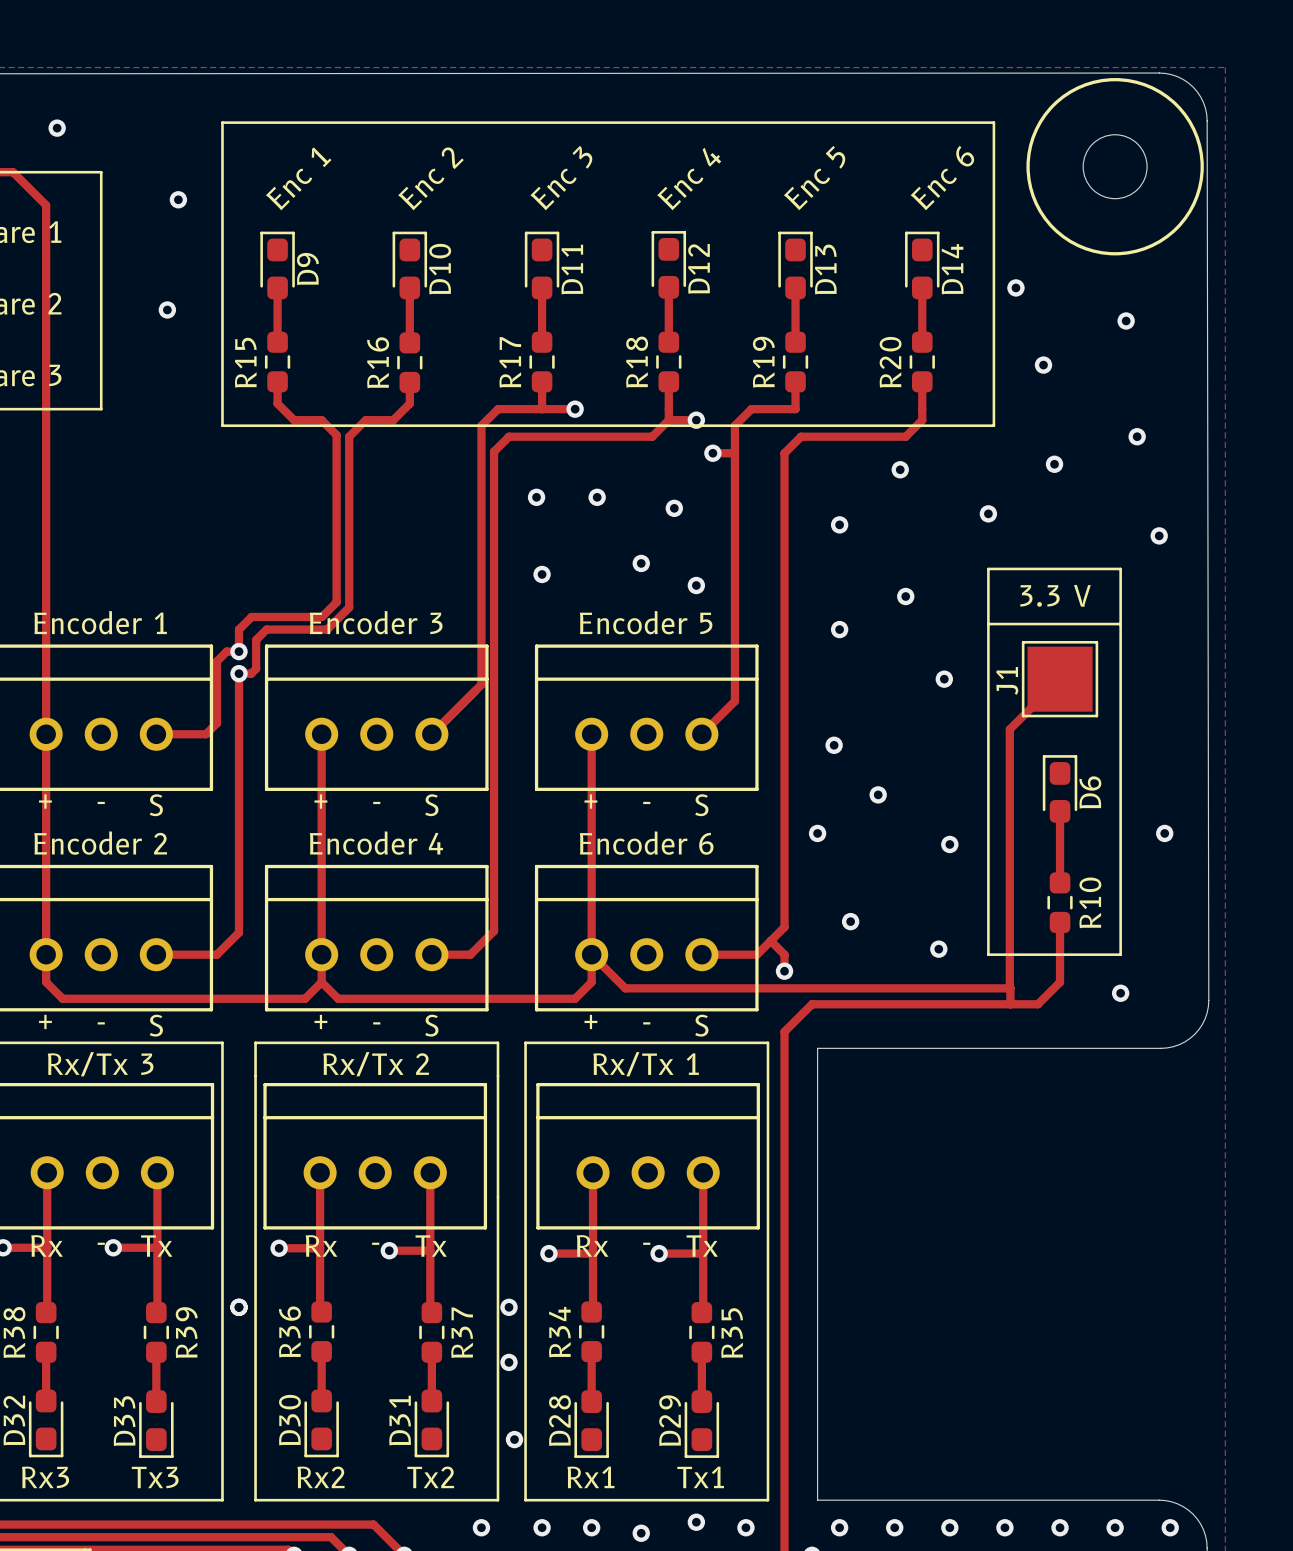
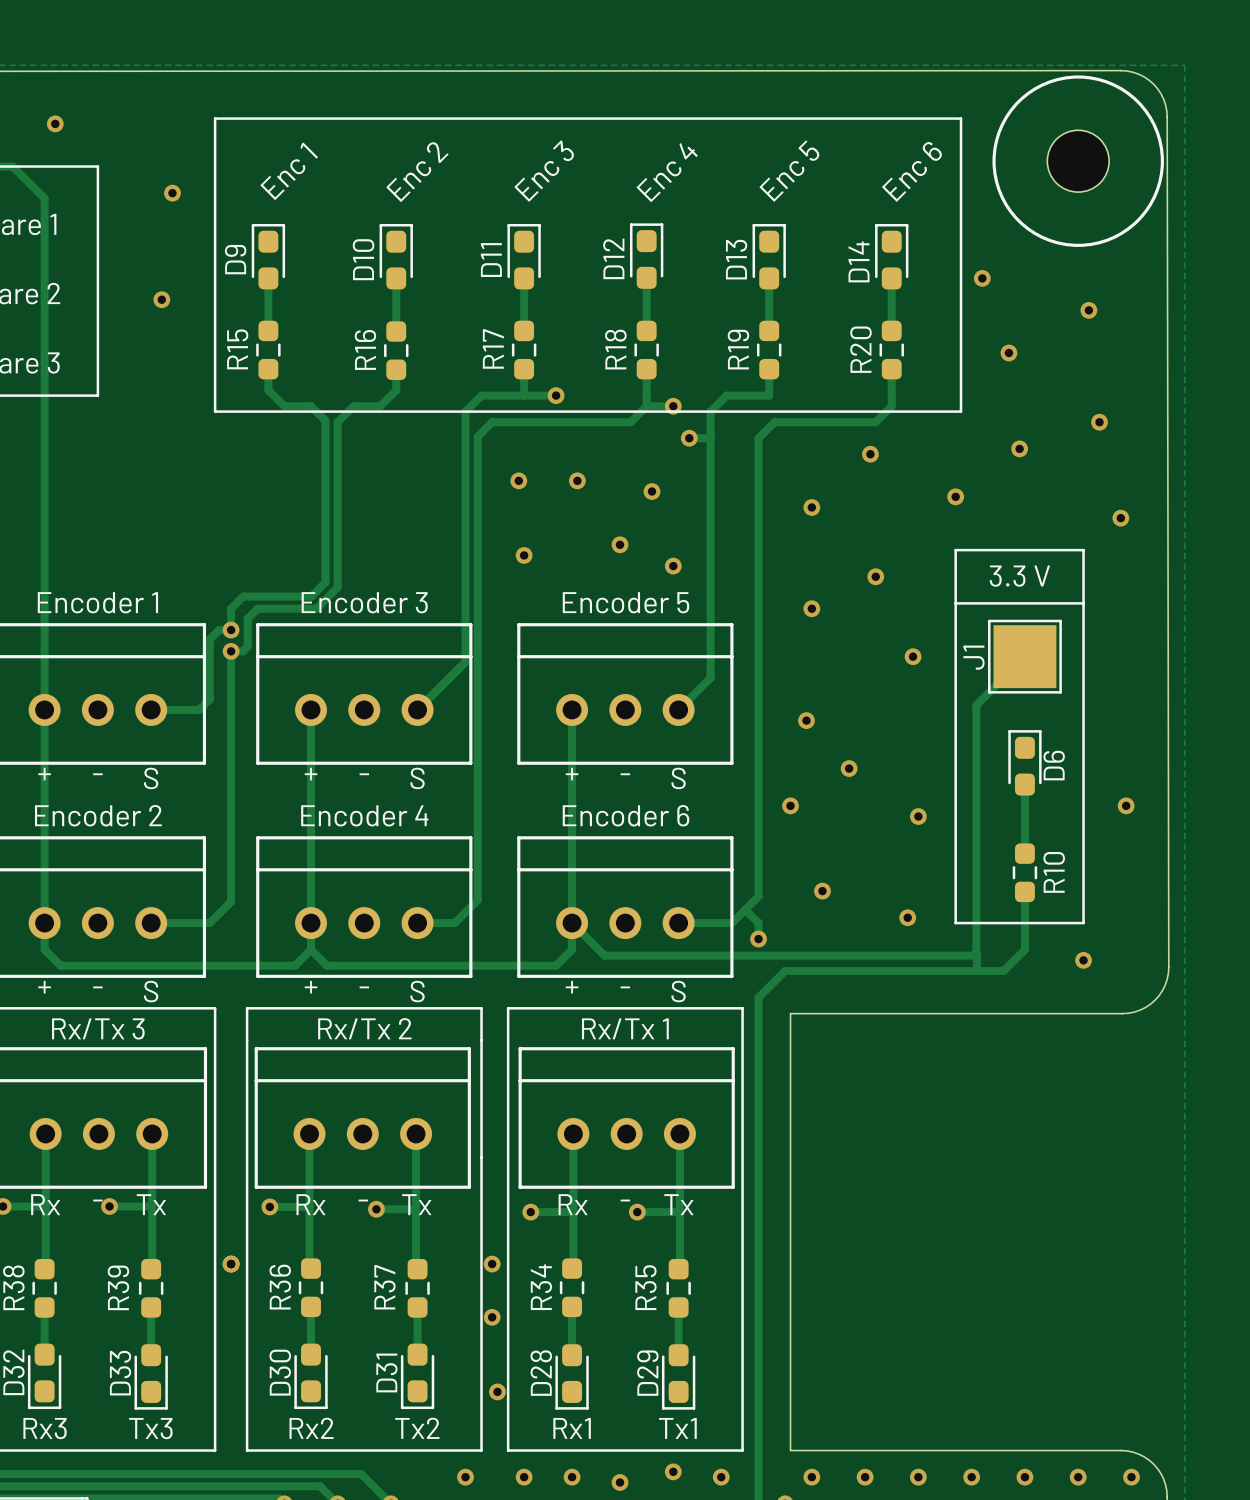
D12 name position: D12 (699, 268) -> D12 (613, 258)
D9 name position: D9 (307, 269) -> D9 (235, 259)
D10 name position: D10 (440, 269) -> D10 (363, 259)
D11 name position: D11 (572, 269) -> D11 (491, 260)
D13 name position: D13 (825, 269) -> D13 (736, 259)
D14 name position: D14 (952, 269) -> D14 (858, 261)
R39 name position: R39 (186, 1332) -> R39 (118, 1287)
R37 name position: R37 (462, 1332) -> R37 (384, 1287)
R35 name position: R35 (732, 1333) -> R35 (646, 1287)

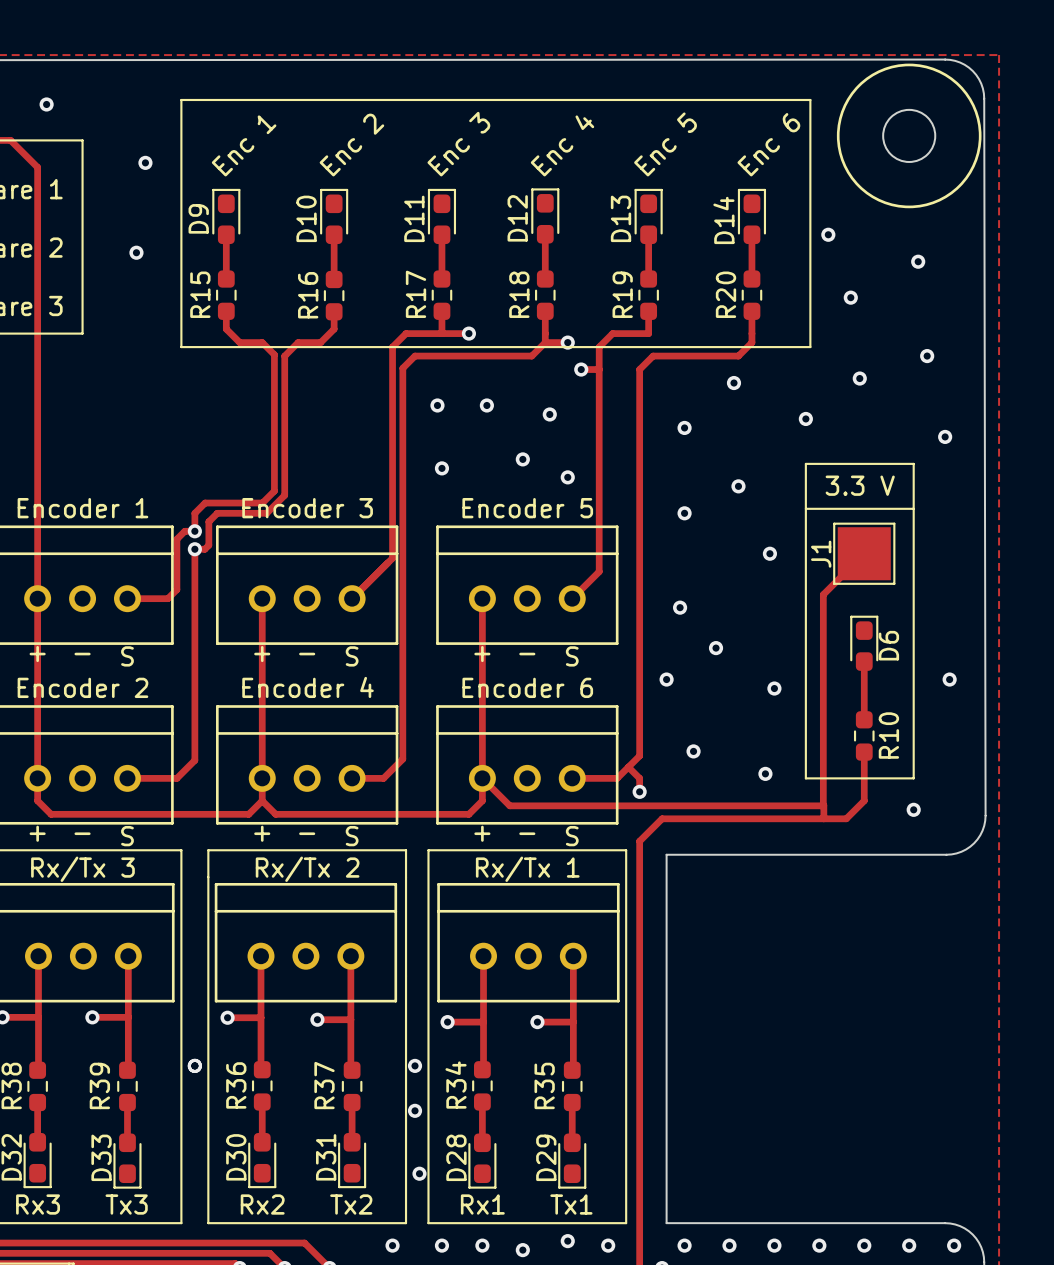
text: - (97, 1200) -> none
text: - (363, 1200) -> none
text: - (625, 1200) -> none
text: Rx (45, 1204) -> none
text: Tx (151, 1204) -> none
text: Rx (311, 1204) -> none
text: Tx (416, 1204) -> none
text: Rx (573, 1204) -> none
text: Tx (678, 1204) -> none

